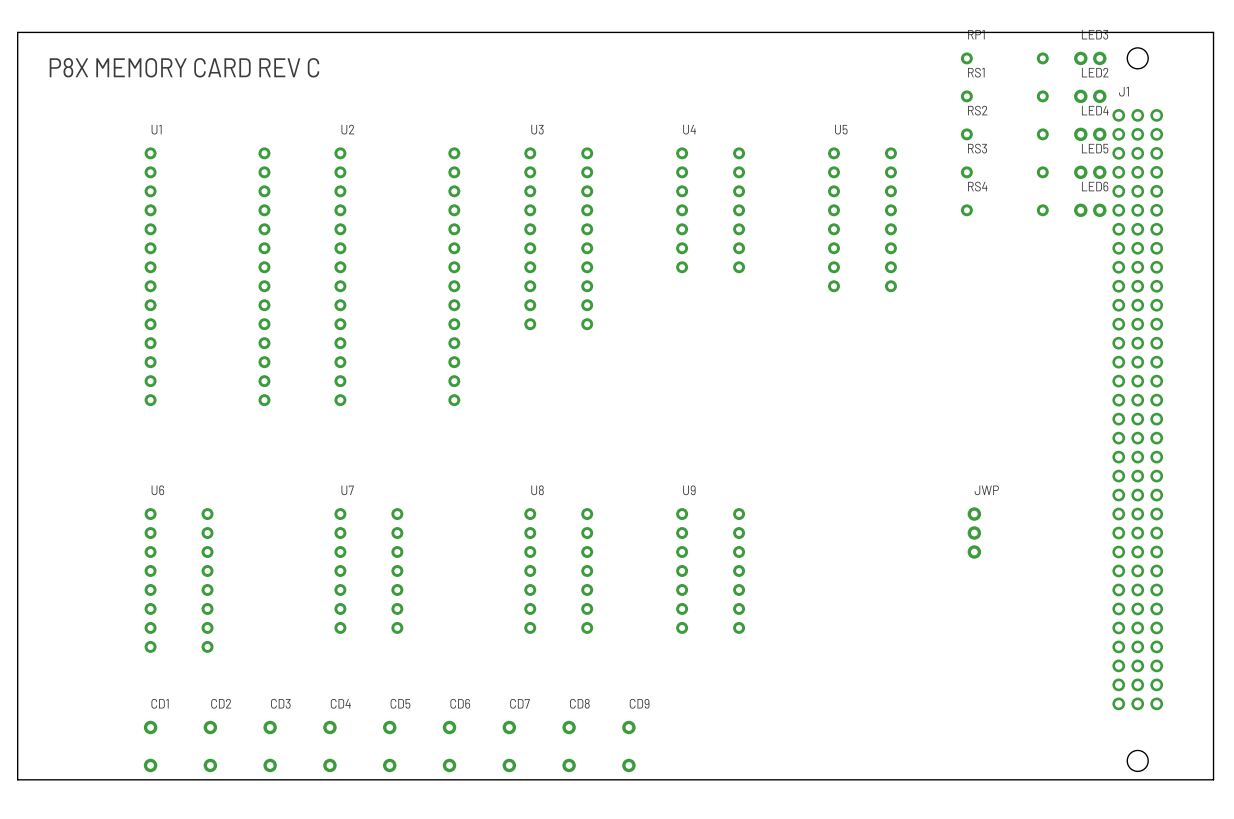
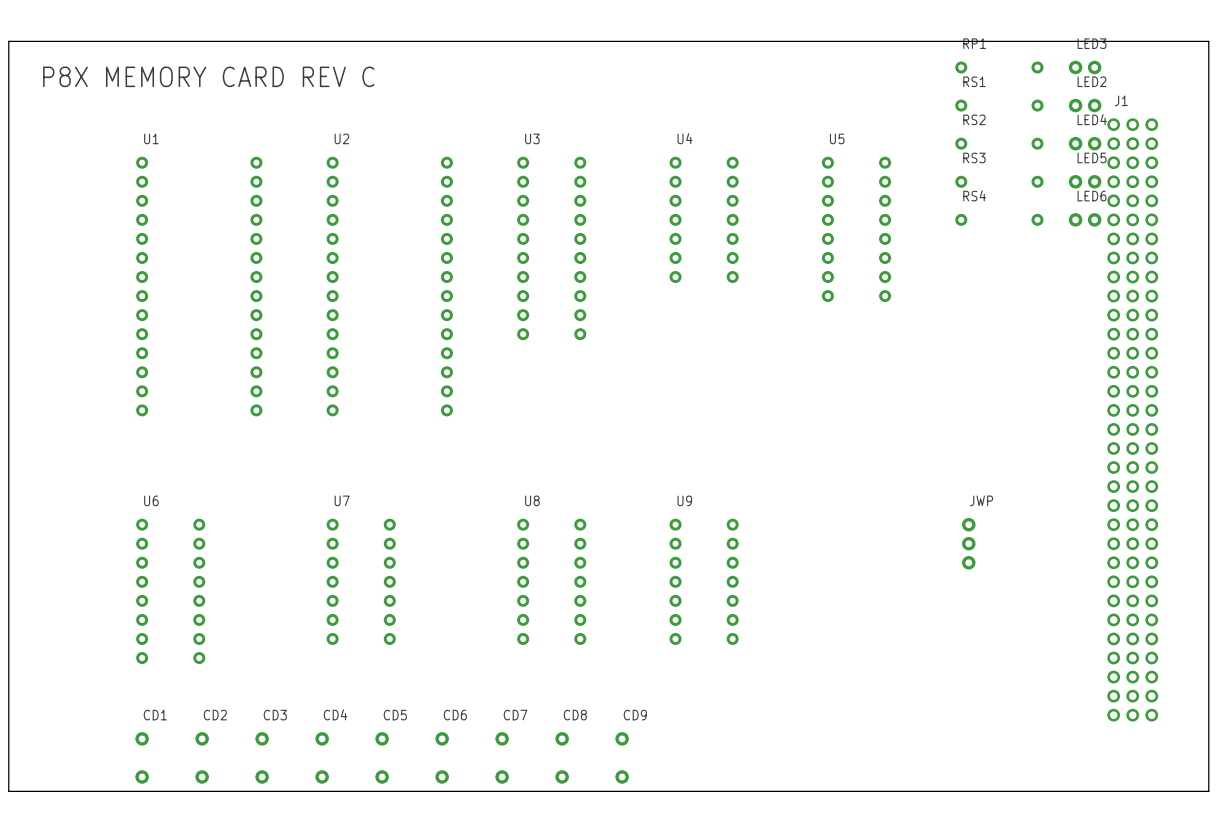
J1 footprint: [1112, 47, 1164, 772] -> [1107, 118, 1159, 722]

